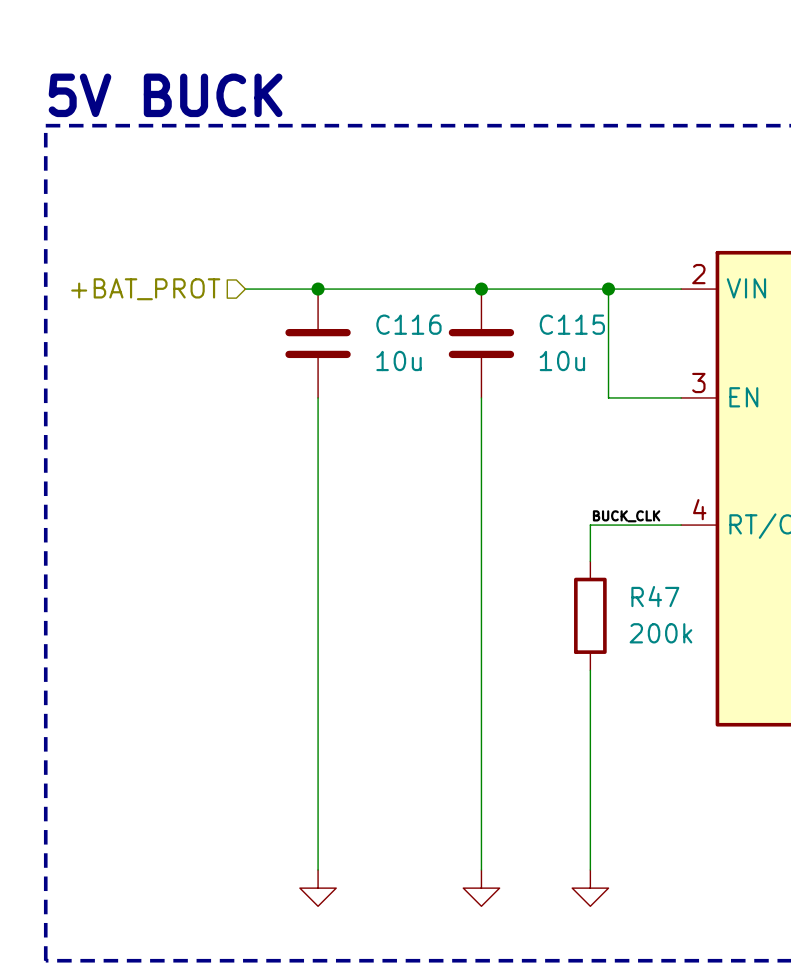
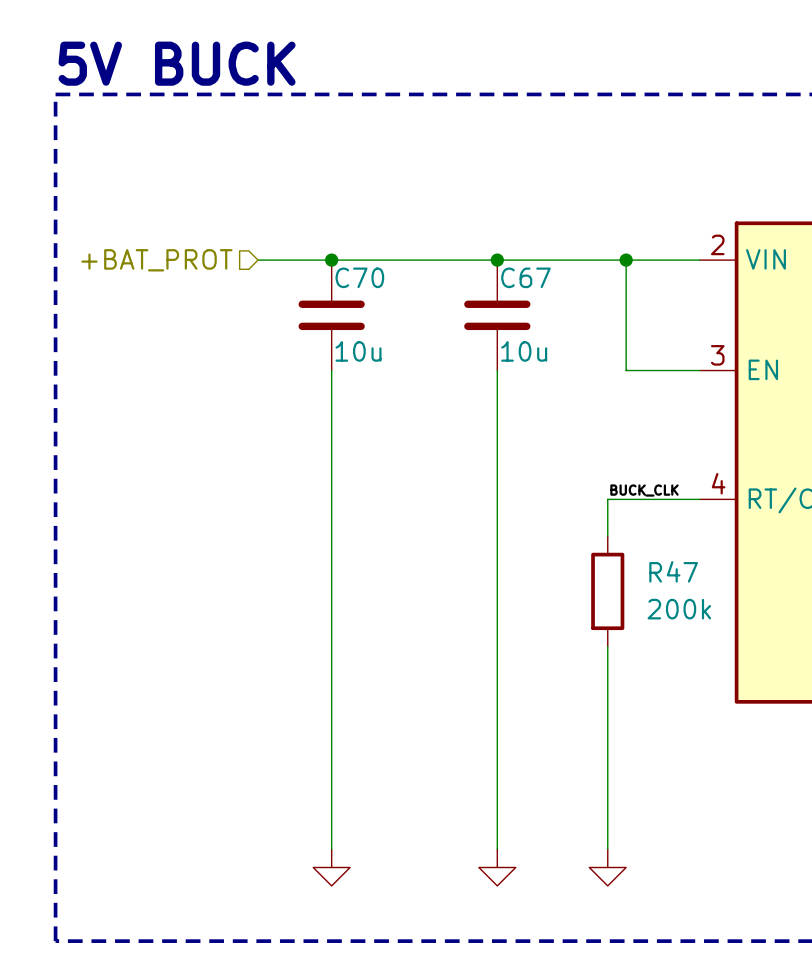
C116 name: C116 (408, 324) -> C70 (359, 277)
C115 name: C115 (572, 324) -> C67 (525, 277)
C116 value position: 10u (399, 360) -> 10u (358, 351)
C115 value position: 10u (562, 360) -> 10u (524, 351)

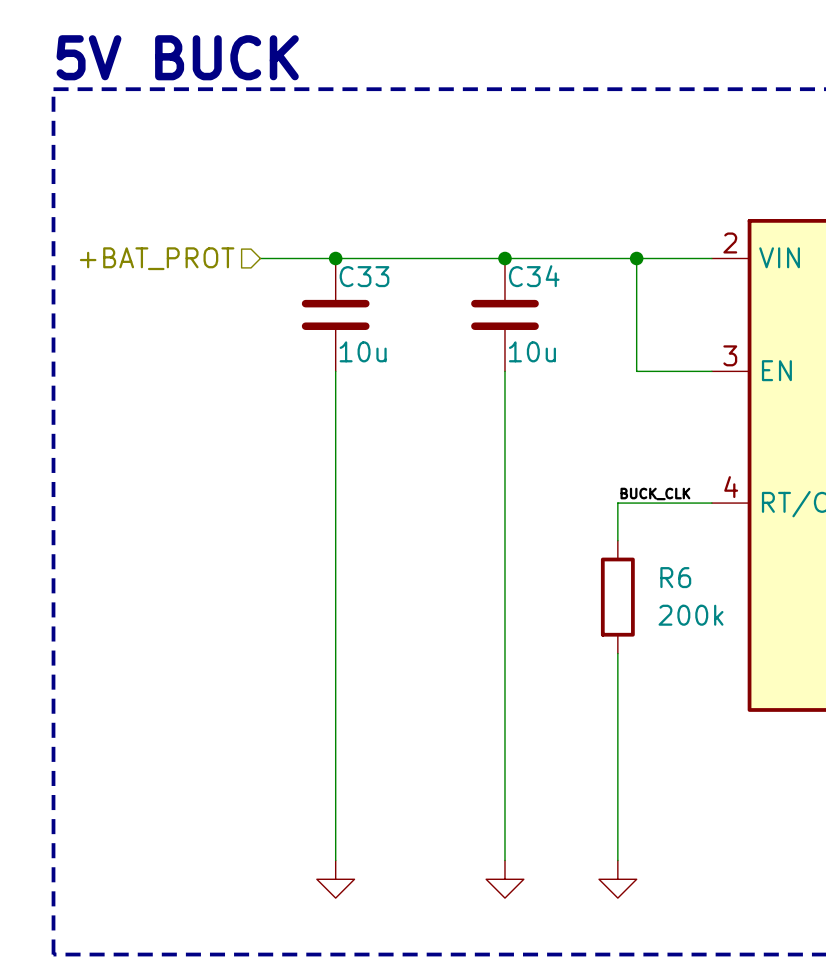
C70 name: C70 (359, 277) -> C33 (364, 276)
C67 name: C67 (525, 277) -> C34 (534, 276)
R47 name: R47 (673, 571) -> R6 (675, 577)

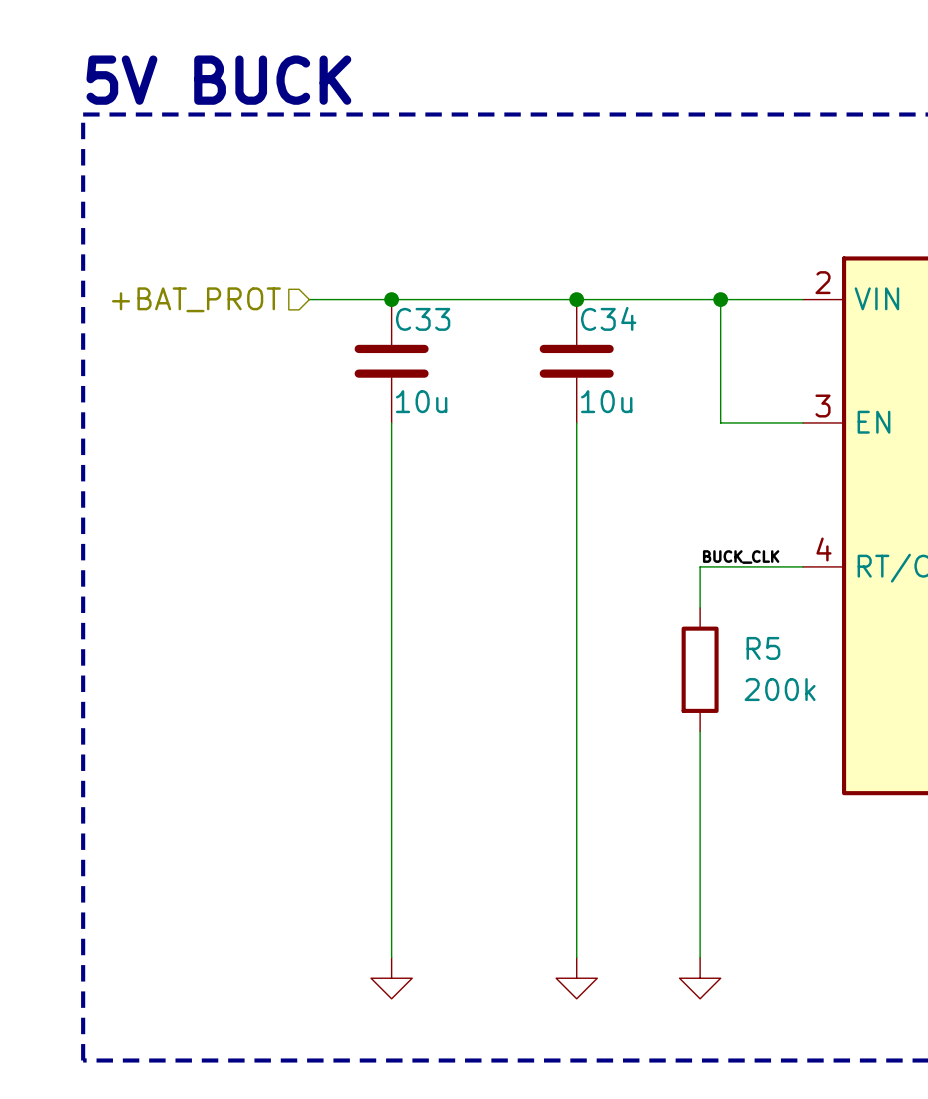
R6 name: R6 (675, 577) -> R5 (763, 648)

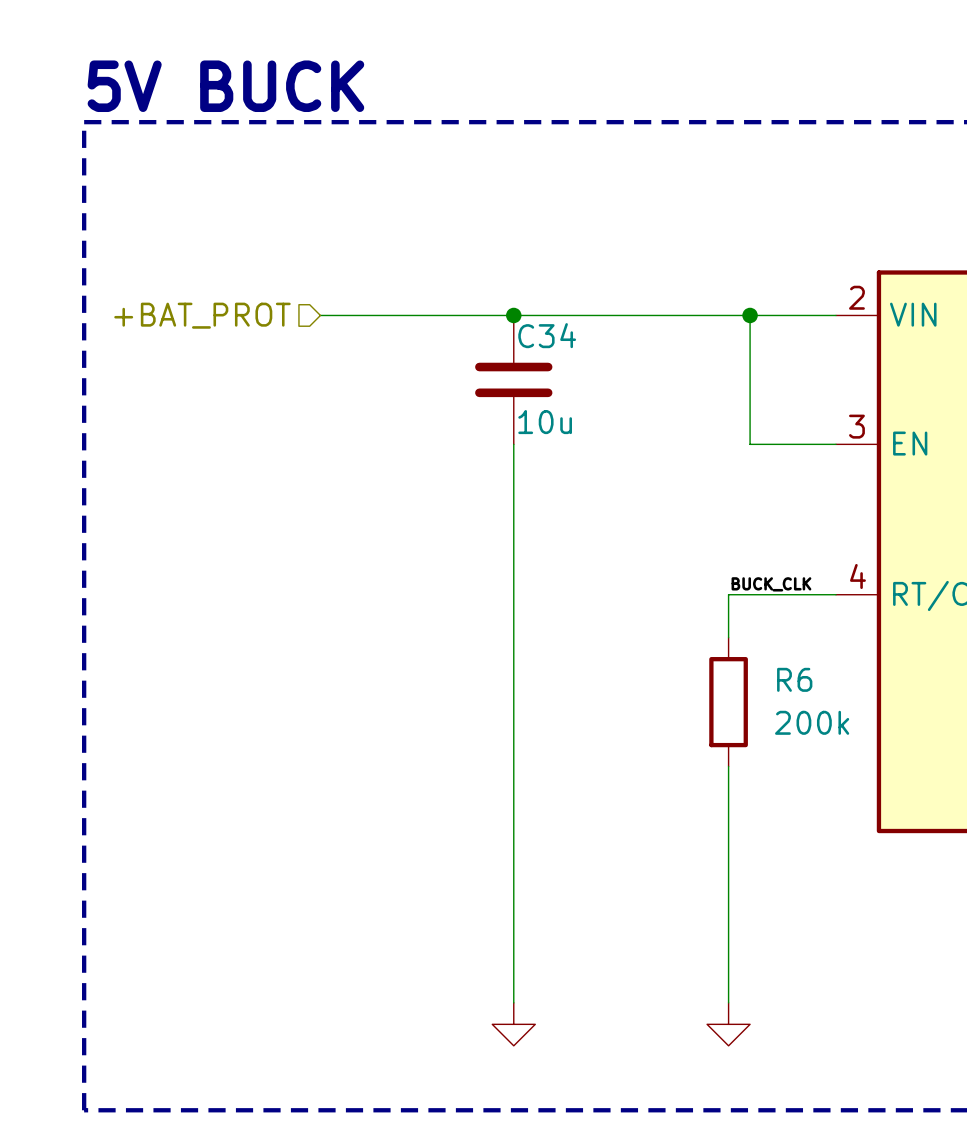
junction: (391, 299) -> none
junction: none -> (513, 315)
junction: (576, 299) -> none
C33: 10u (391, 361) -> none
C34 position: (576, 361) -> (513, 379)
wire: (391, 422) (391, 957) -> none
wire: (576, 422) (576, 957) -> (513, 444) (513, 1002)
R5 name: R5 (763, 648) -> R6 (794, 679)
power symbol: (391, 978) -> none
power symbol: none -> (513, 1024)
power symbol: (576, 978) -> none

